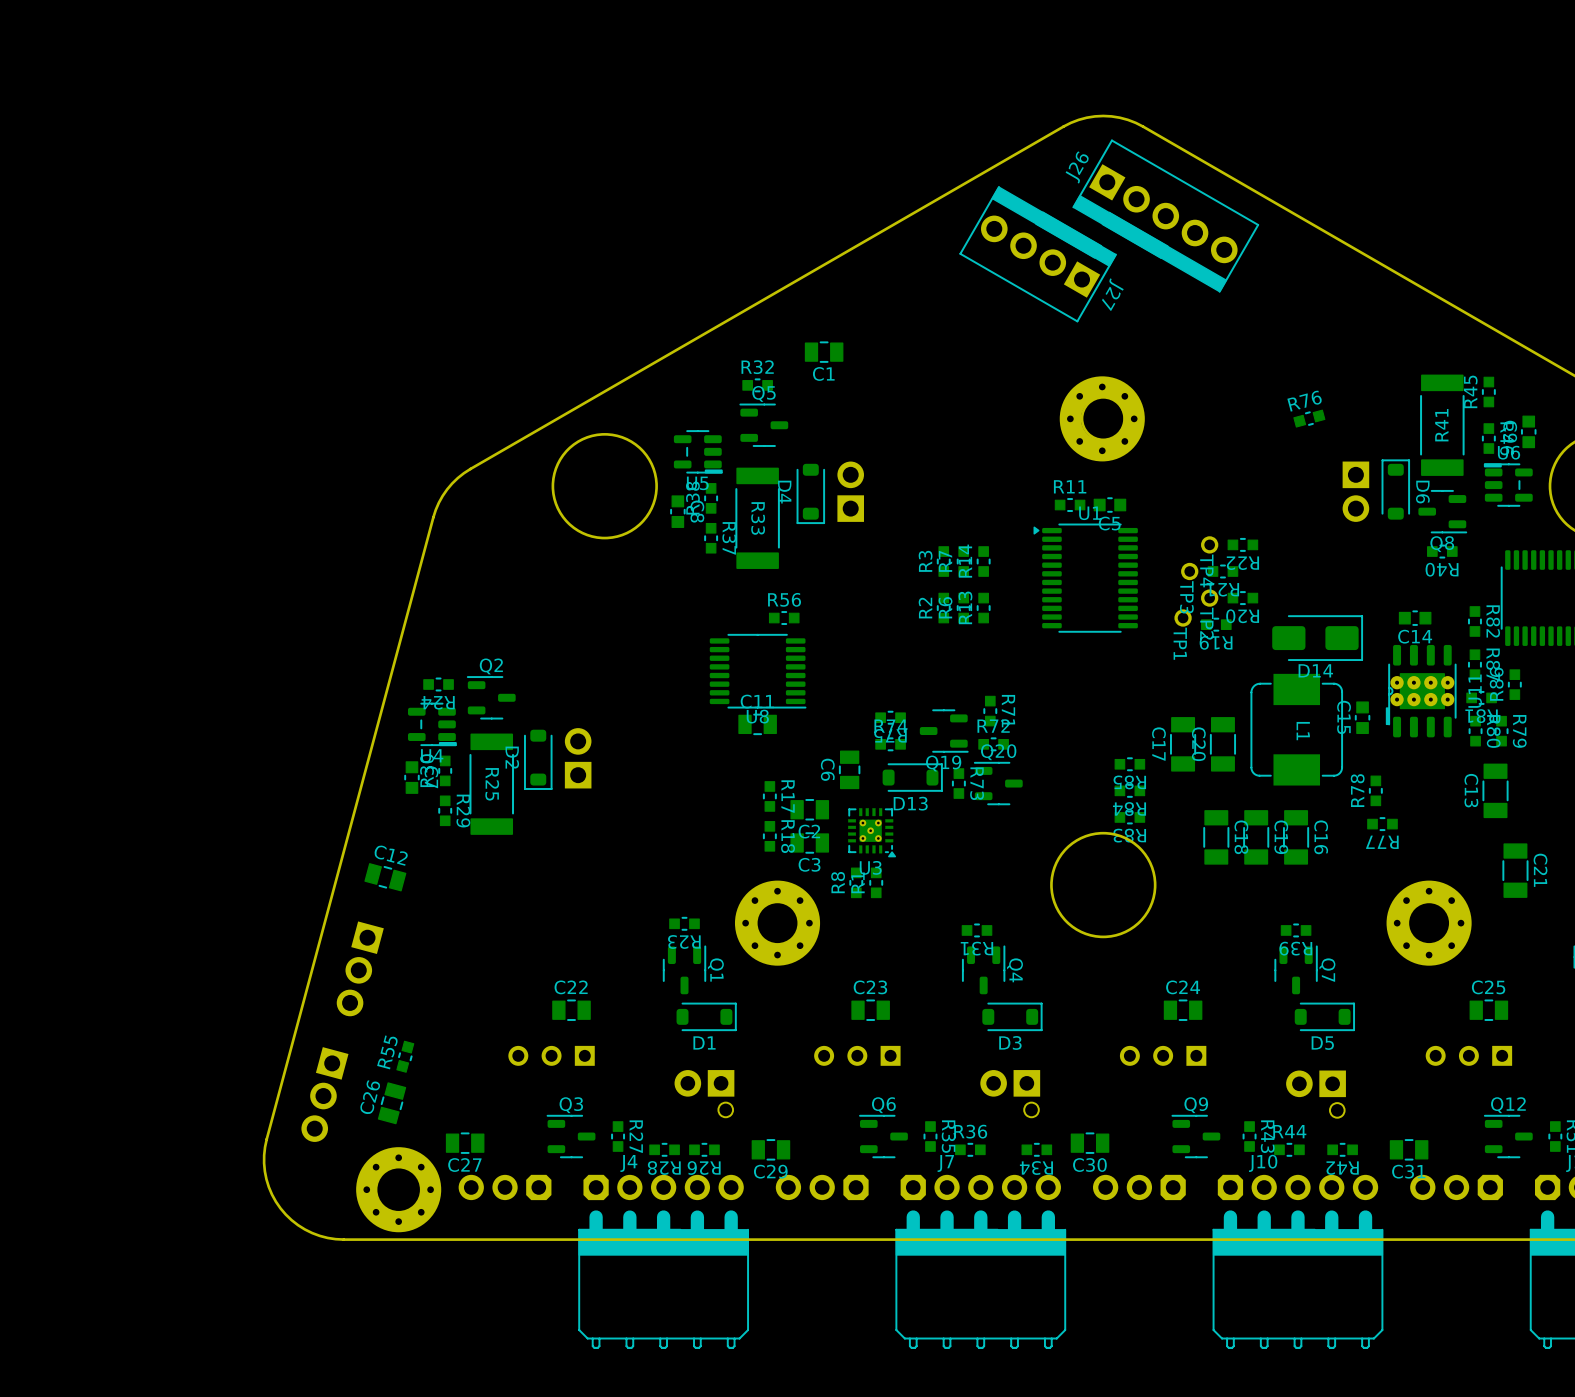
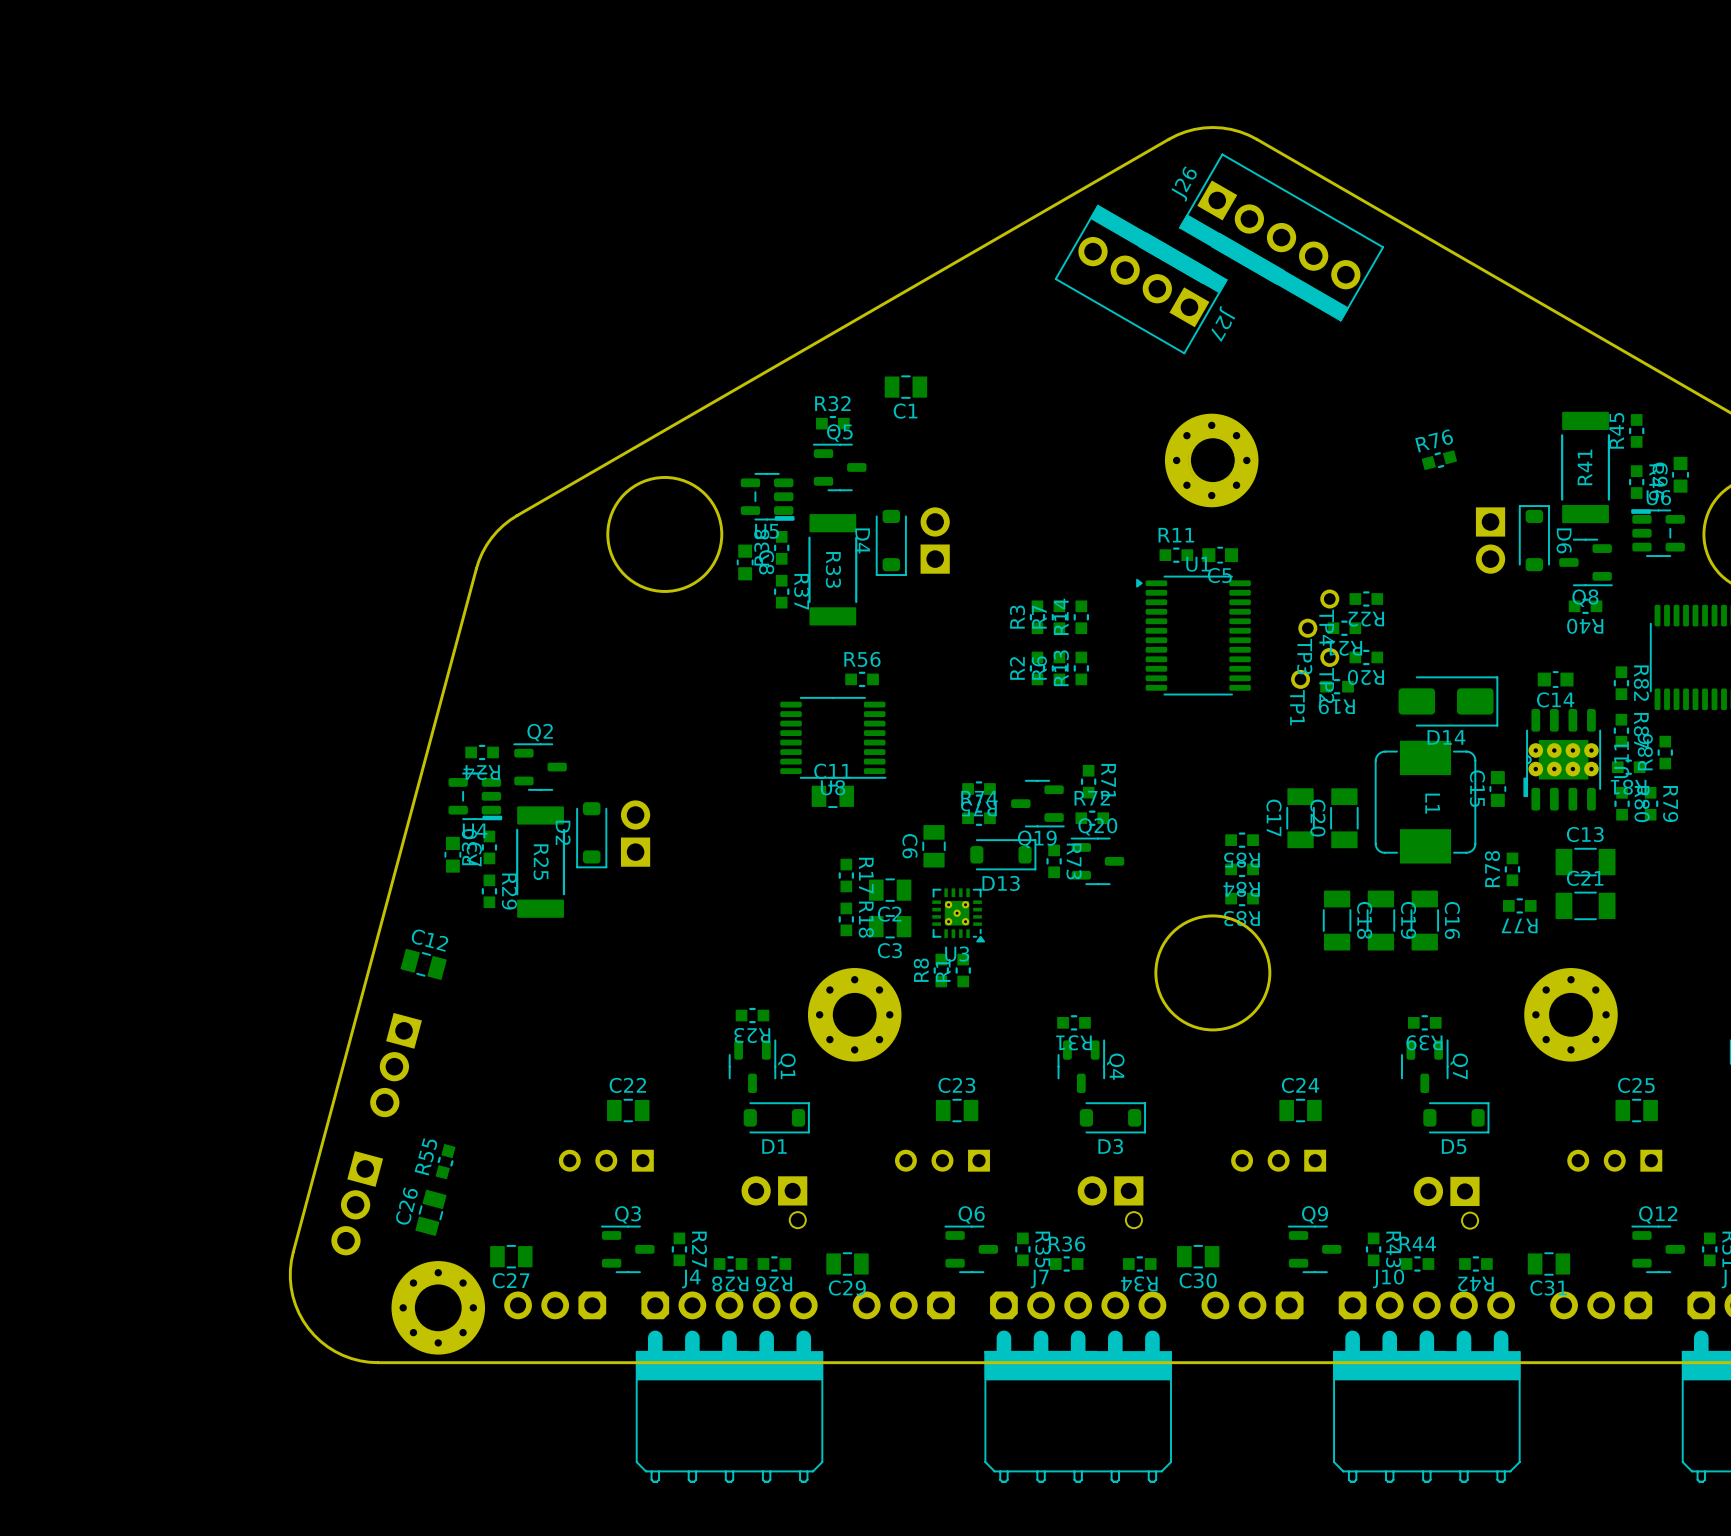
C13 rotation: 0° (1495, 790) -> 90° clockwise (1585, 862)
C13 position: (1495, 790) -> (1585, 862)
C21 rotation: 0° (1515, 870) -> 90° clockwise (1585, 905)
C21 position: (1515, 870) -> (1585, 905)
C21 name position: C21 (1540, 870) -> C21 (1585, 878)

